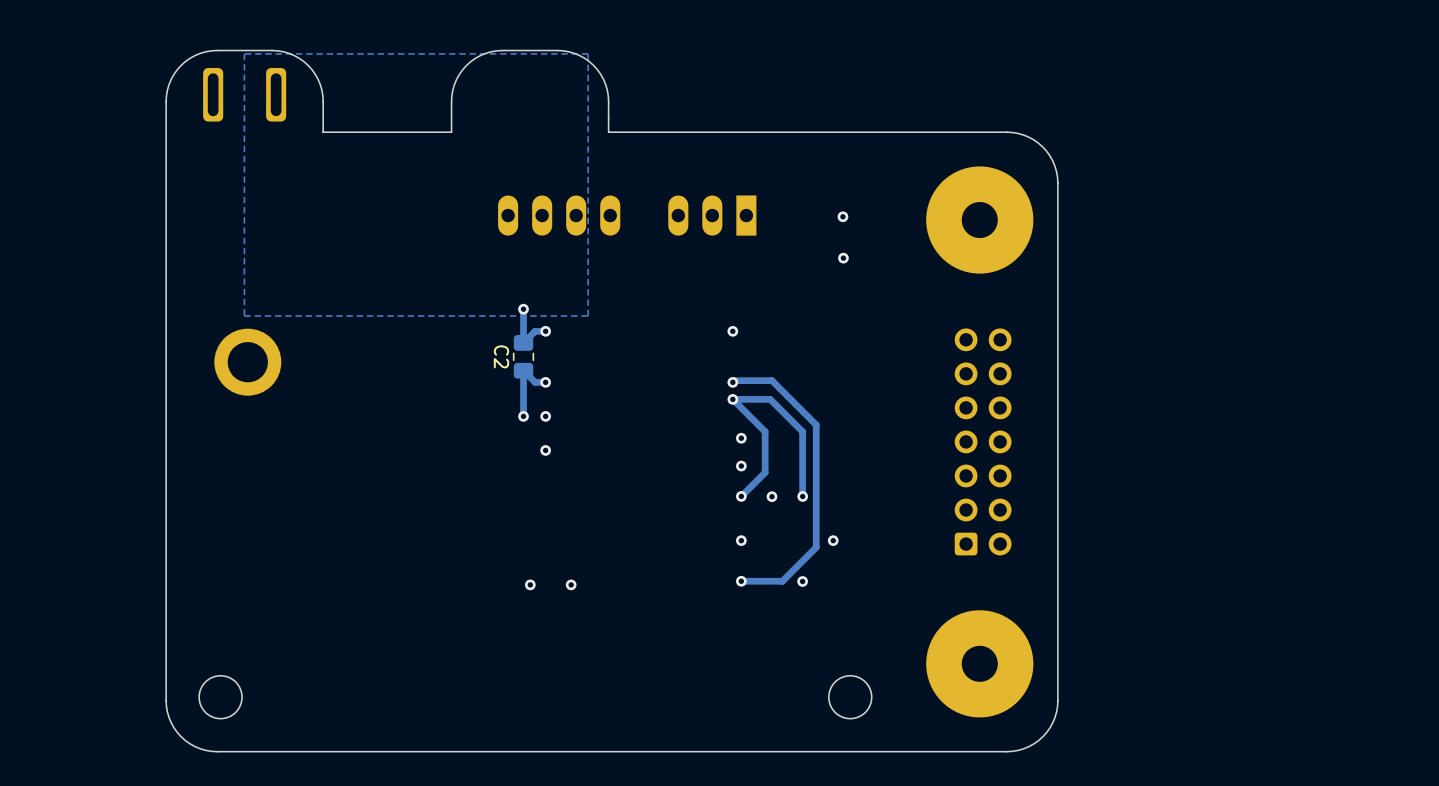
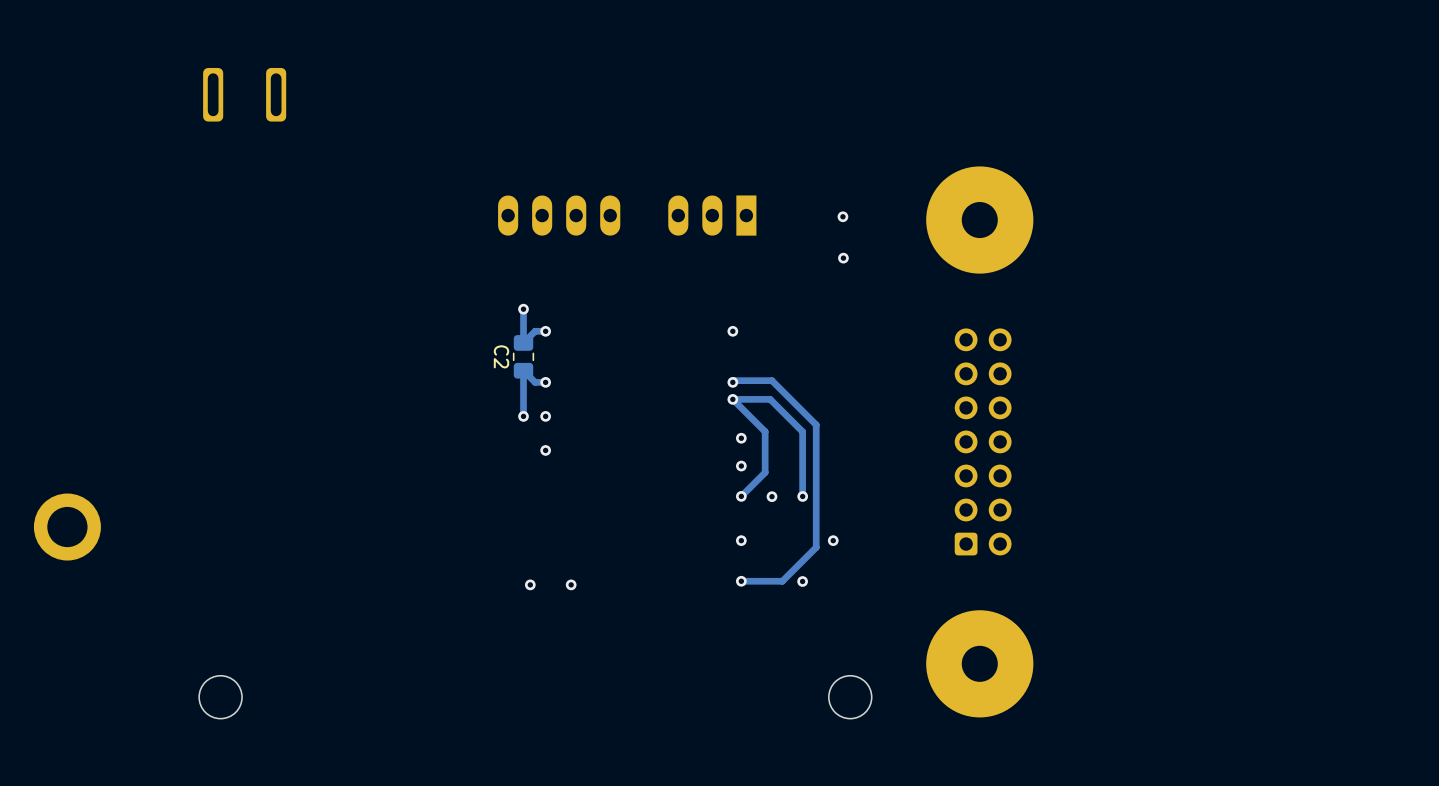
board edge: (557, 50) (496, 50) (485, 53) (470, 61) (459, 74) (452, 90) (451, 132) (323, 132) (322, 95) (318, 79) (303, 61) (283, 51) (205, 51) (190, 58) (173, 74) (167, 90) (166, 101) (166, 700) (168, 717) (173, 727) (181, 736) (195, 746) (217, 751) (1006, 751) (1018, 750) (1033, 743) (1046, 732) (1052, 722) (1057, 700) (1057, 183) (1055, 166) (1050, 156) (1038, 143) (1028, 137) (1006, 132) (608, 132) (608, 95) (600, 74) (584, 58) (574, 53) (557, 50) -> none
zone outline: (588, 53) (588, 316) (244, 316) (244, 53) (588, 53) -> none
part position: (247, 362) -> (67, 527)

